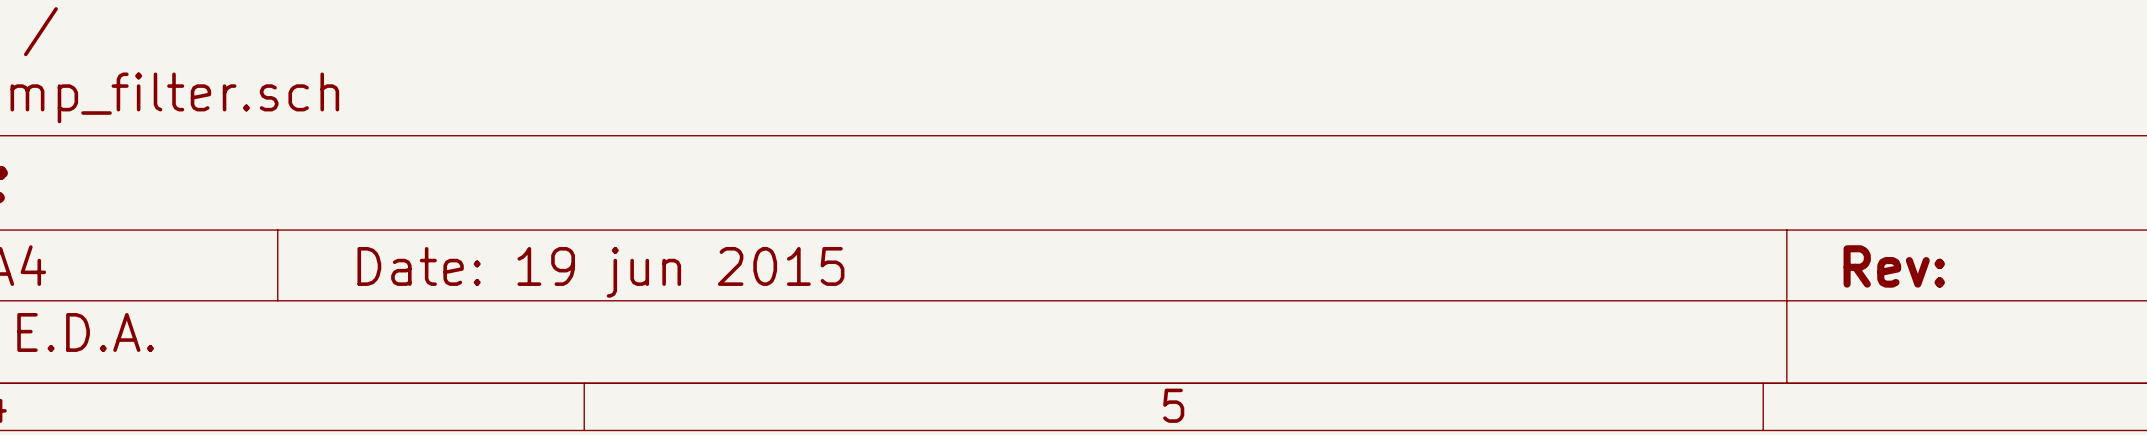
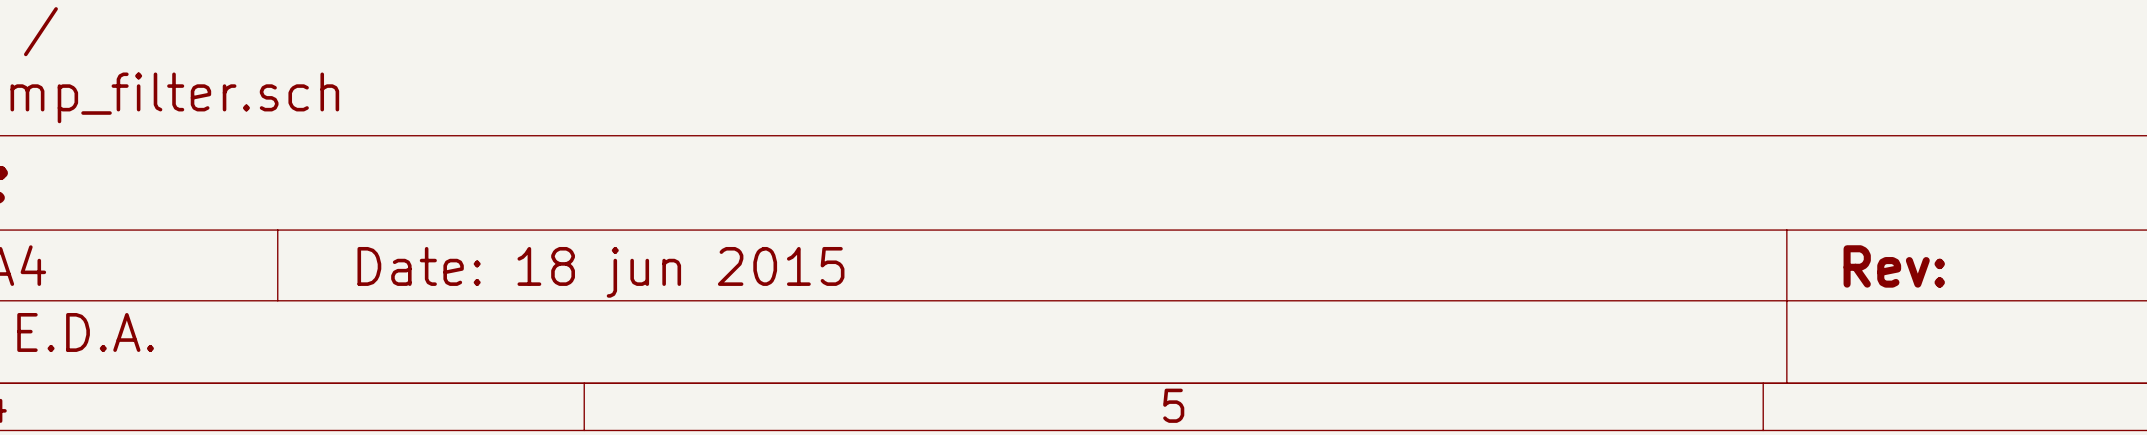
title block: Date: 19 jun 2015 (600, 272) -> Date: 18 jun 2015 (600, 272)

